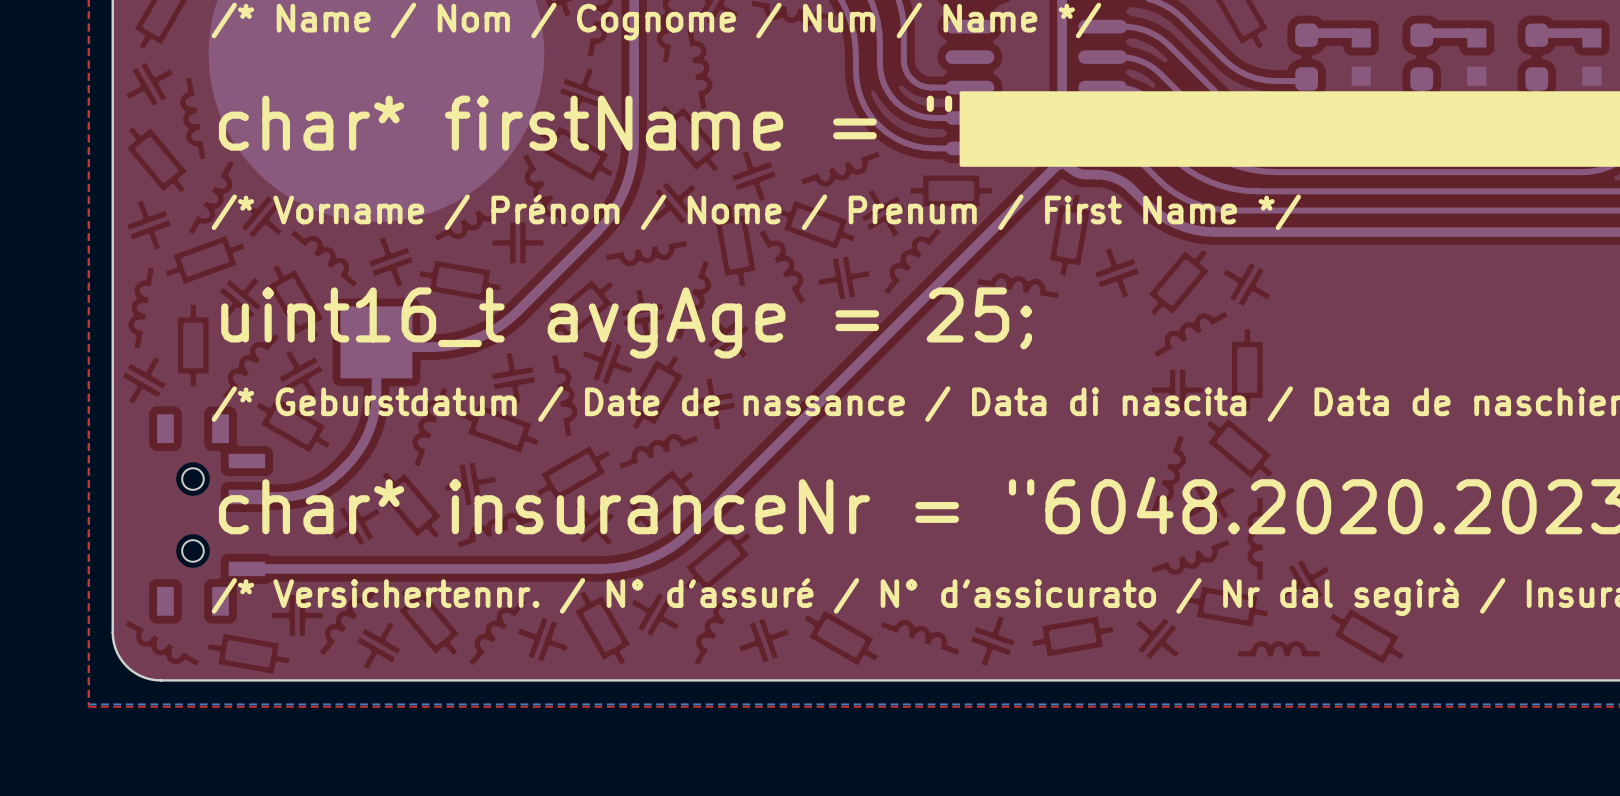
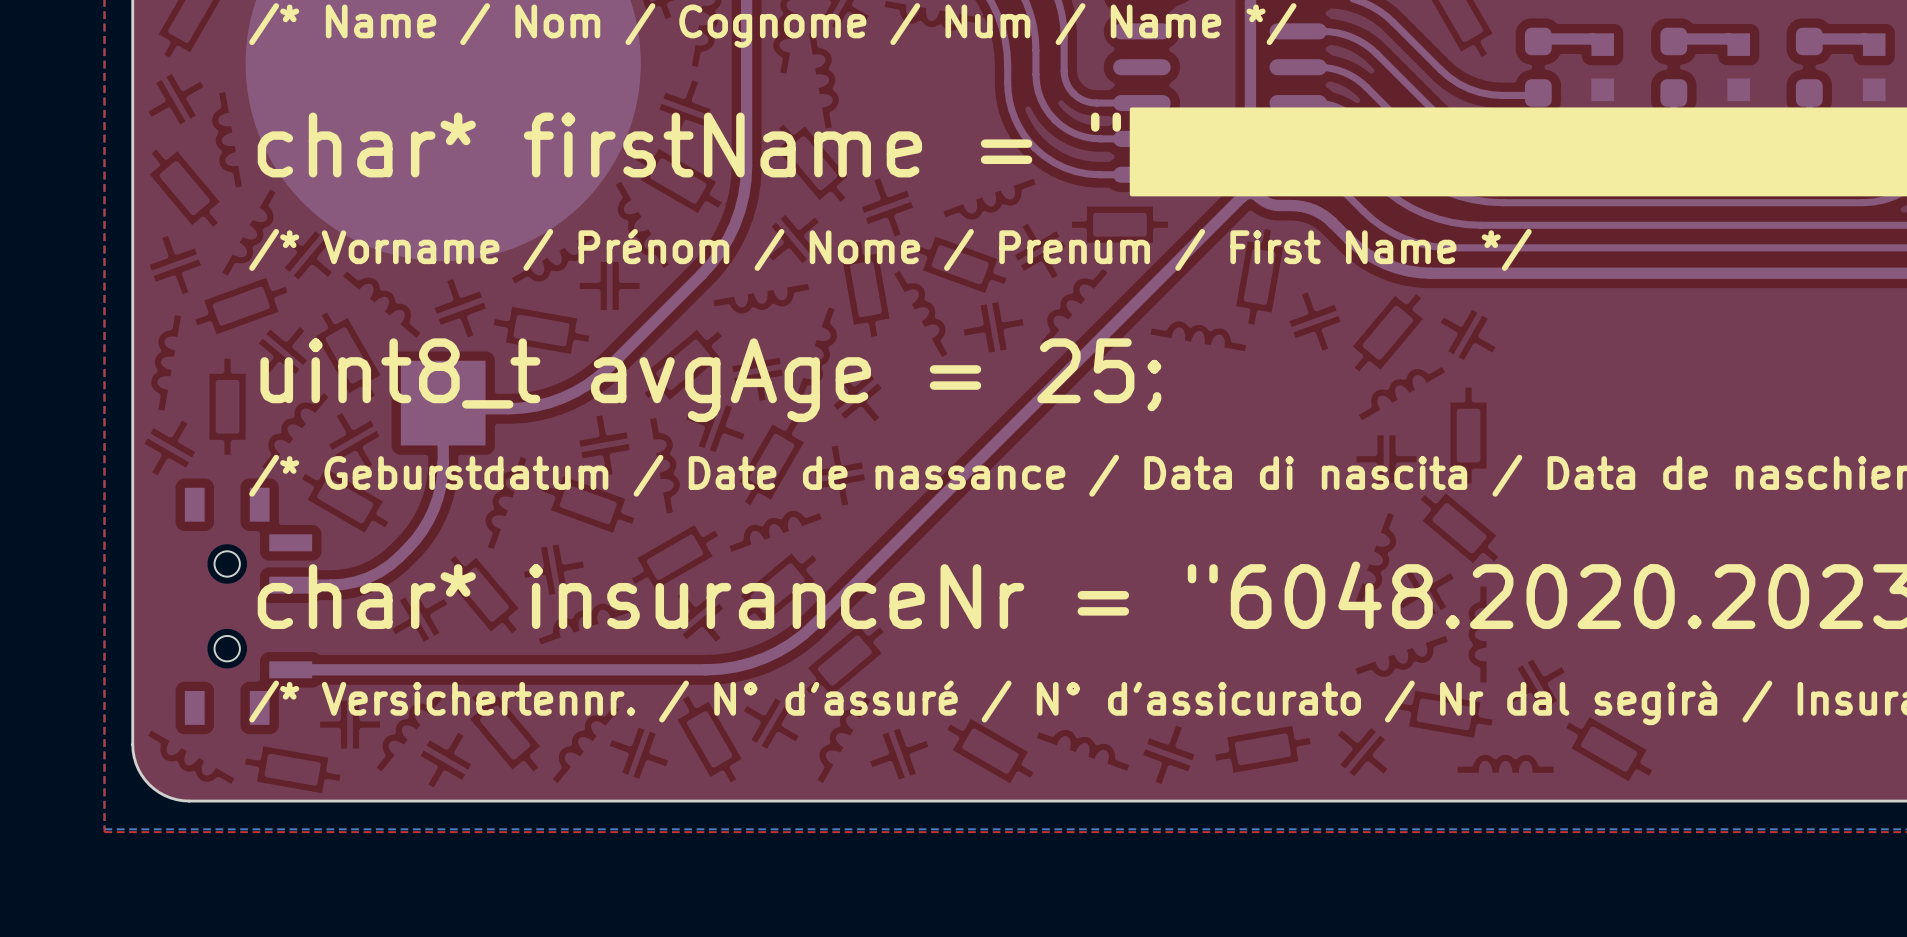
text: uint16_t avgAge = 25; (626, 322) -> uint8_t avgAge = 25; (710, 380)

